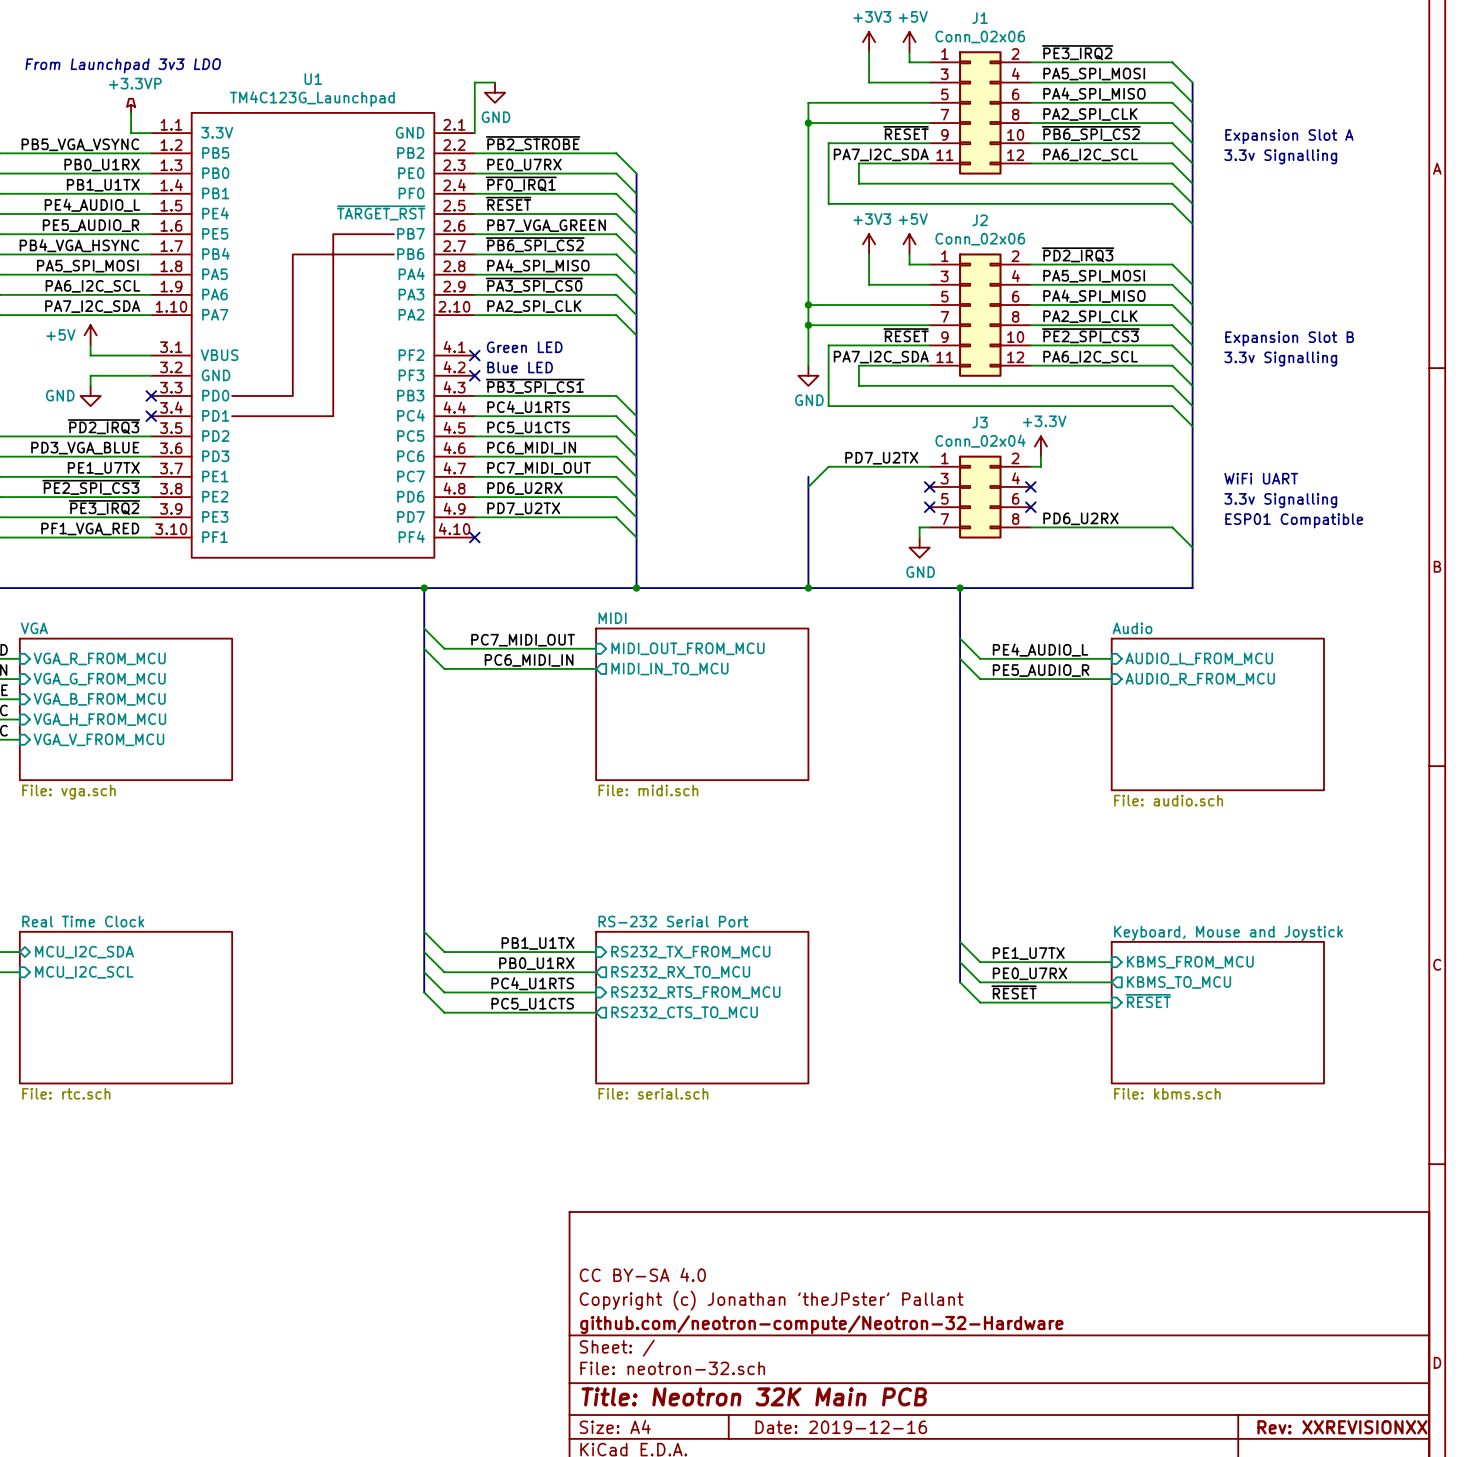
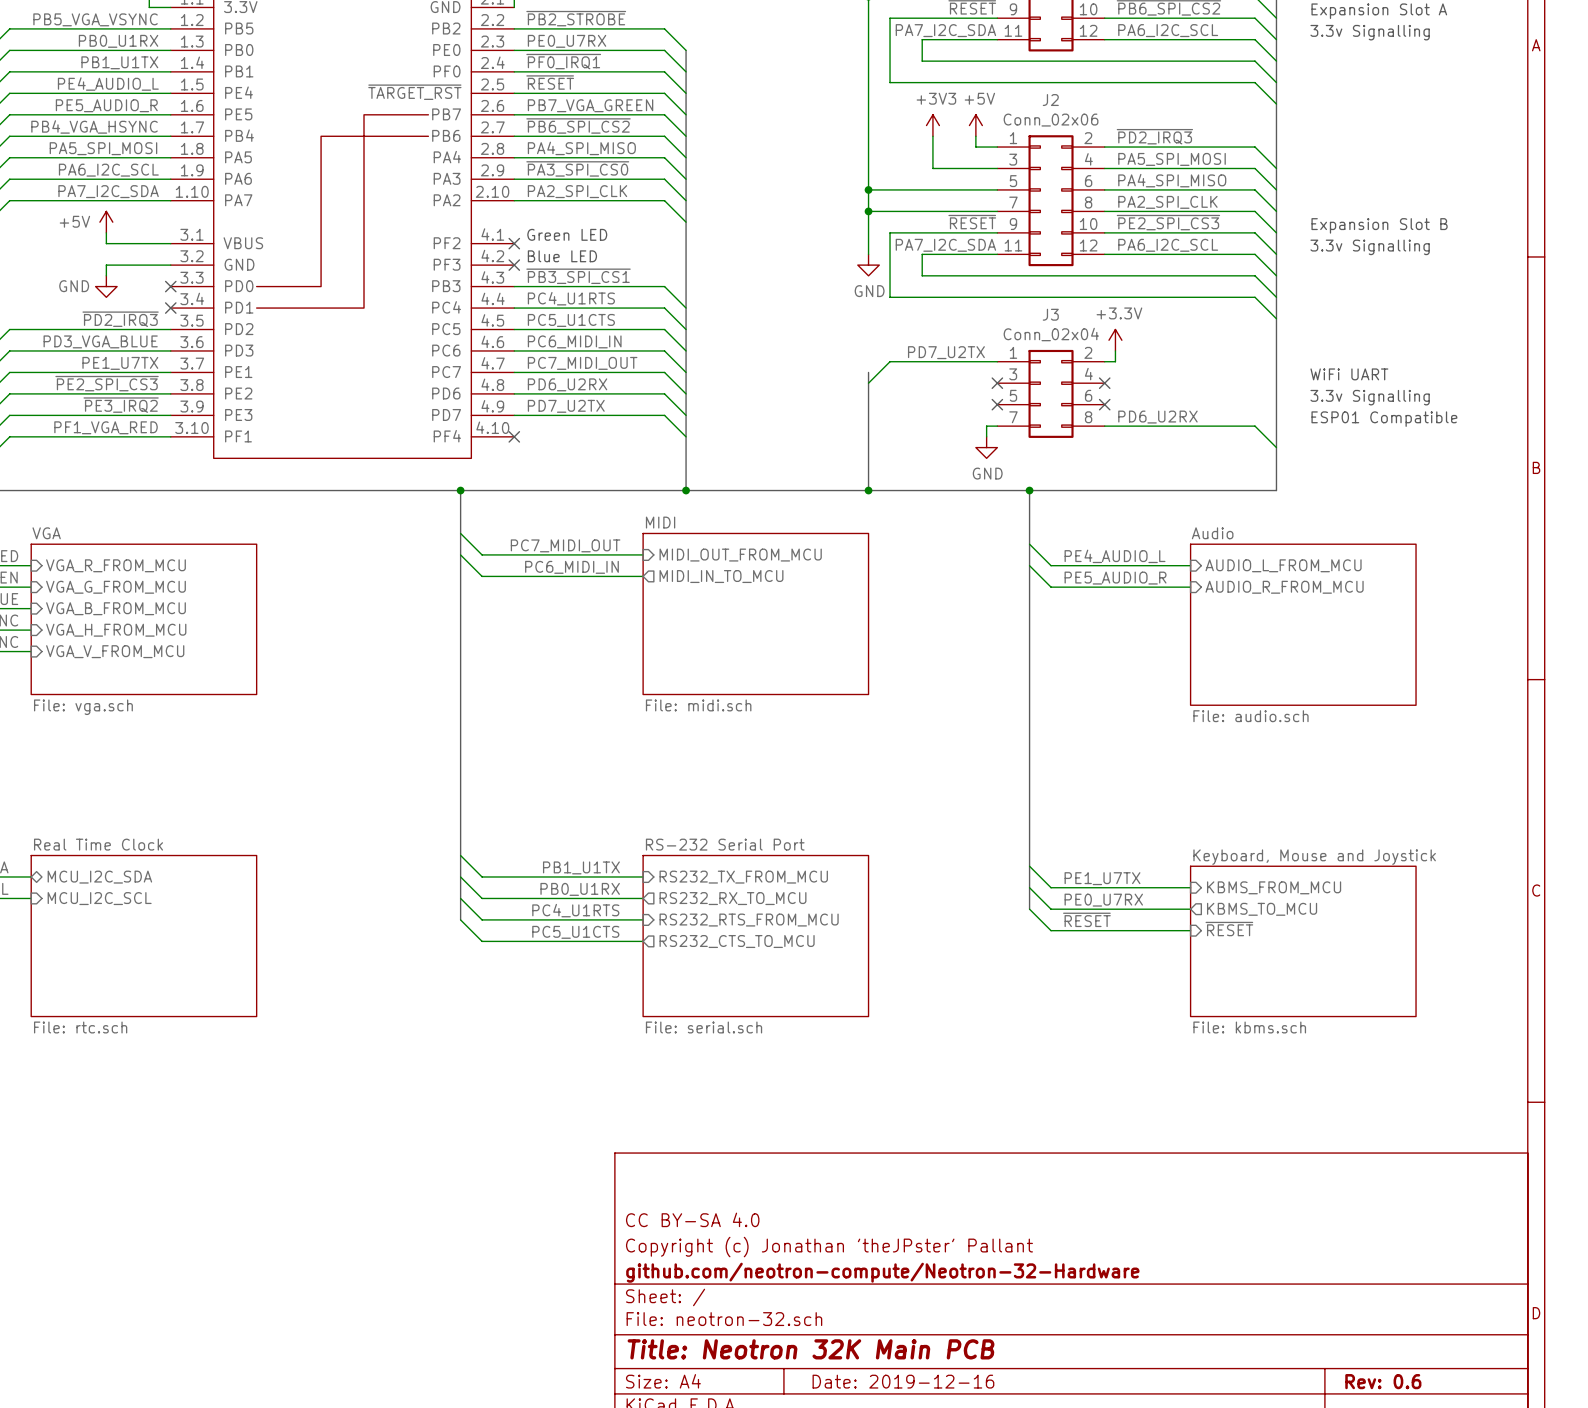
title block: Rev: XXREVISIONXX (1342, 1427) -> Rev: 0.6 (1383, 1381)

